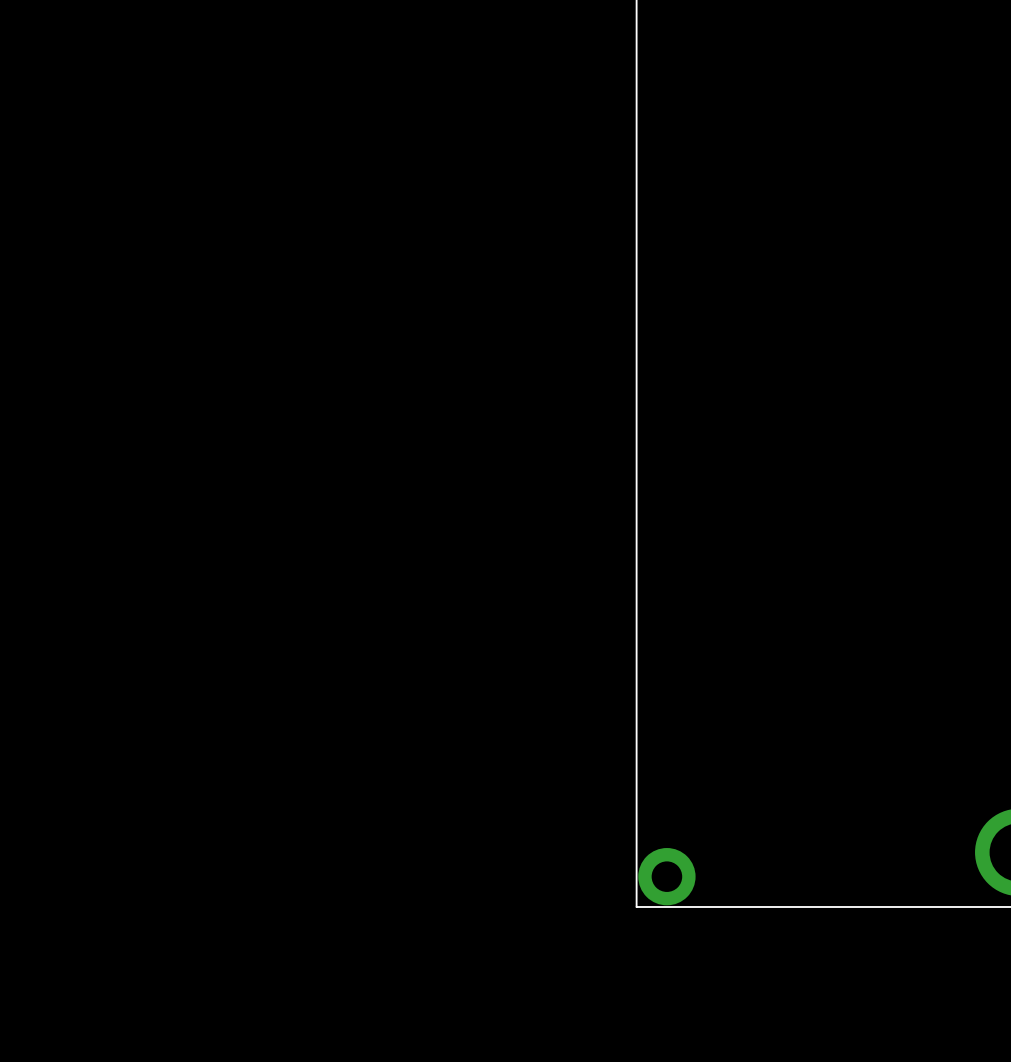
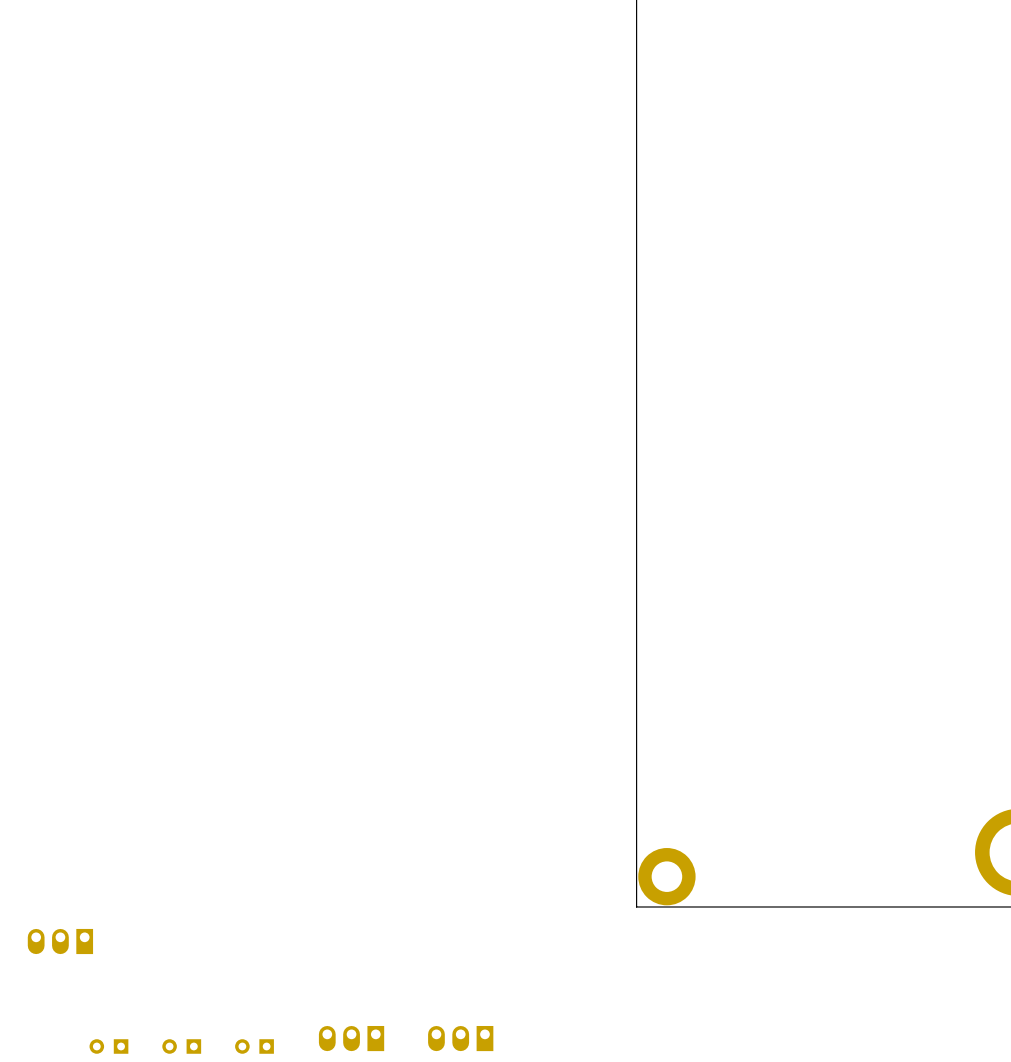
part: none -> (60, 941)
part: none -> (351, 1038)
part: none -> (460, 1038)
part: none -> (108, 1046)
part: none -> (181, 1046)
part: none -> (254, 1046)

